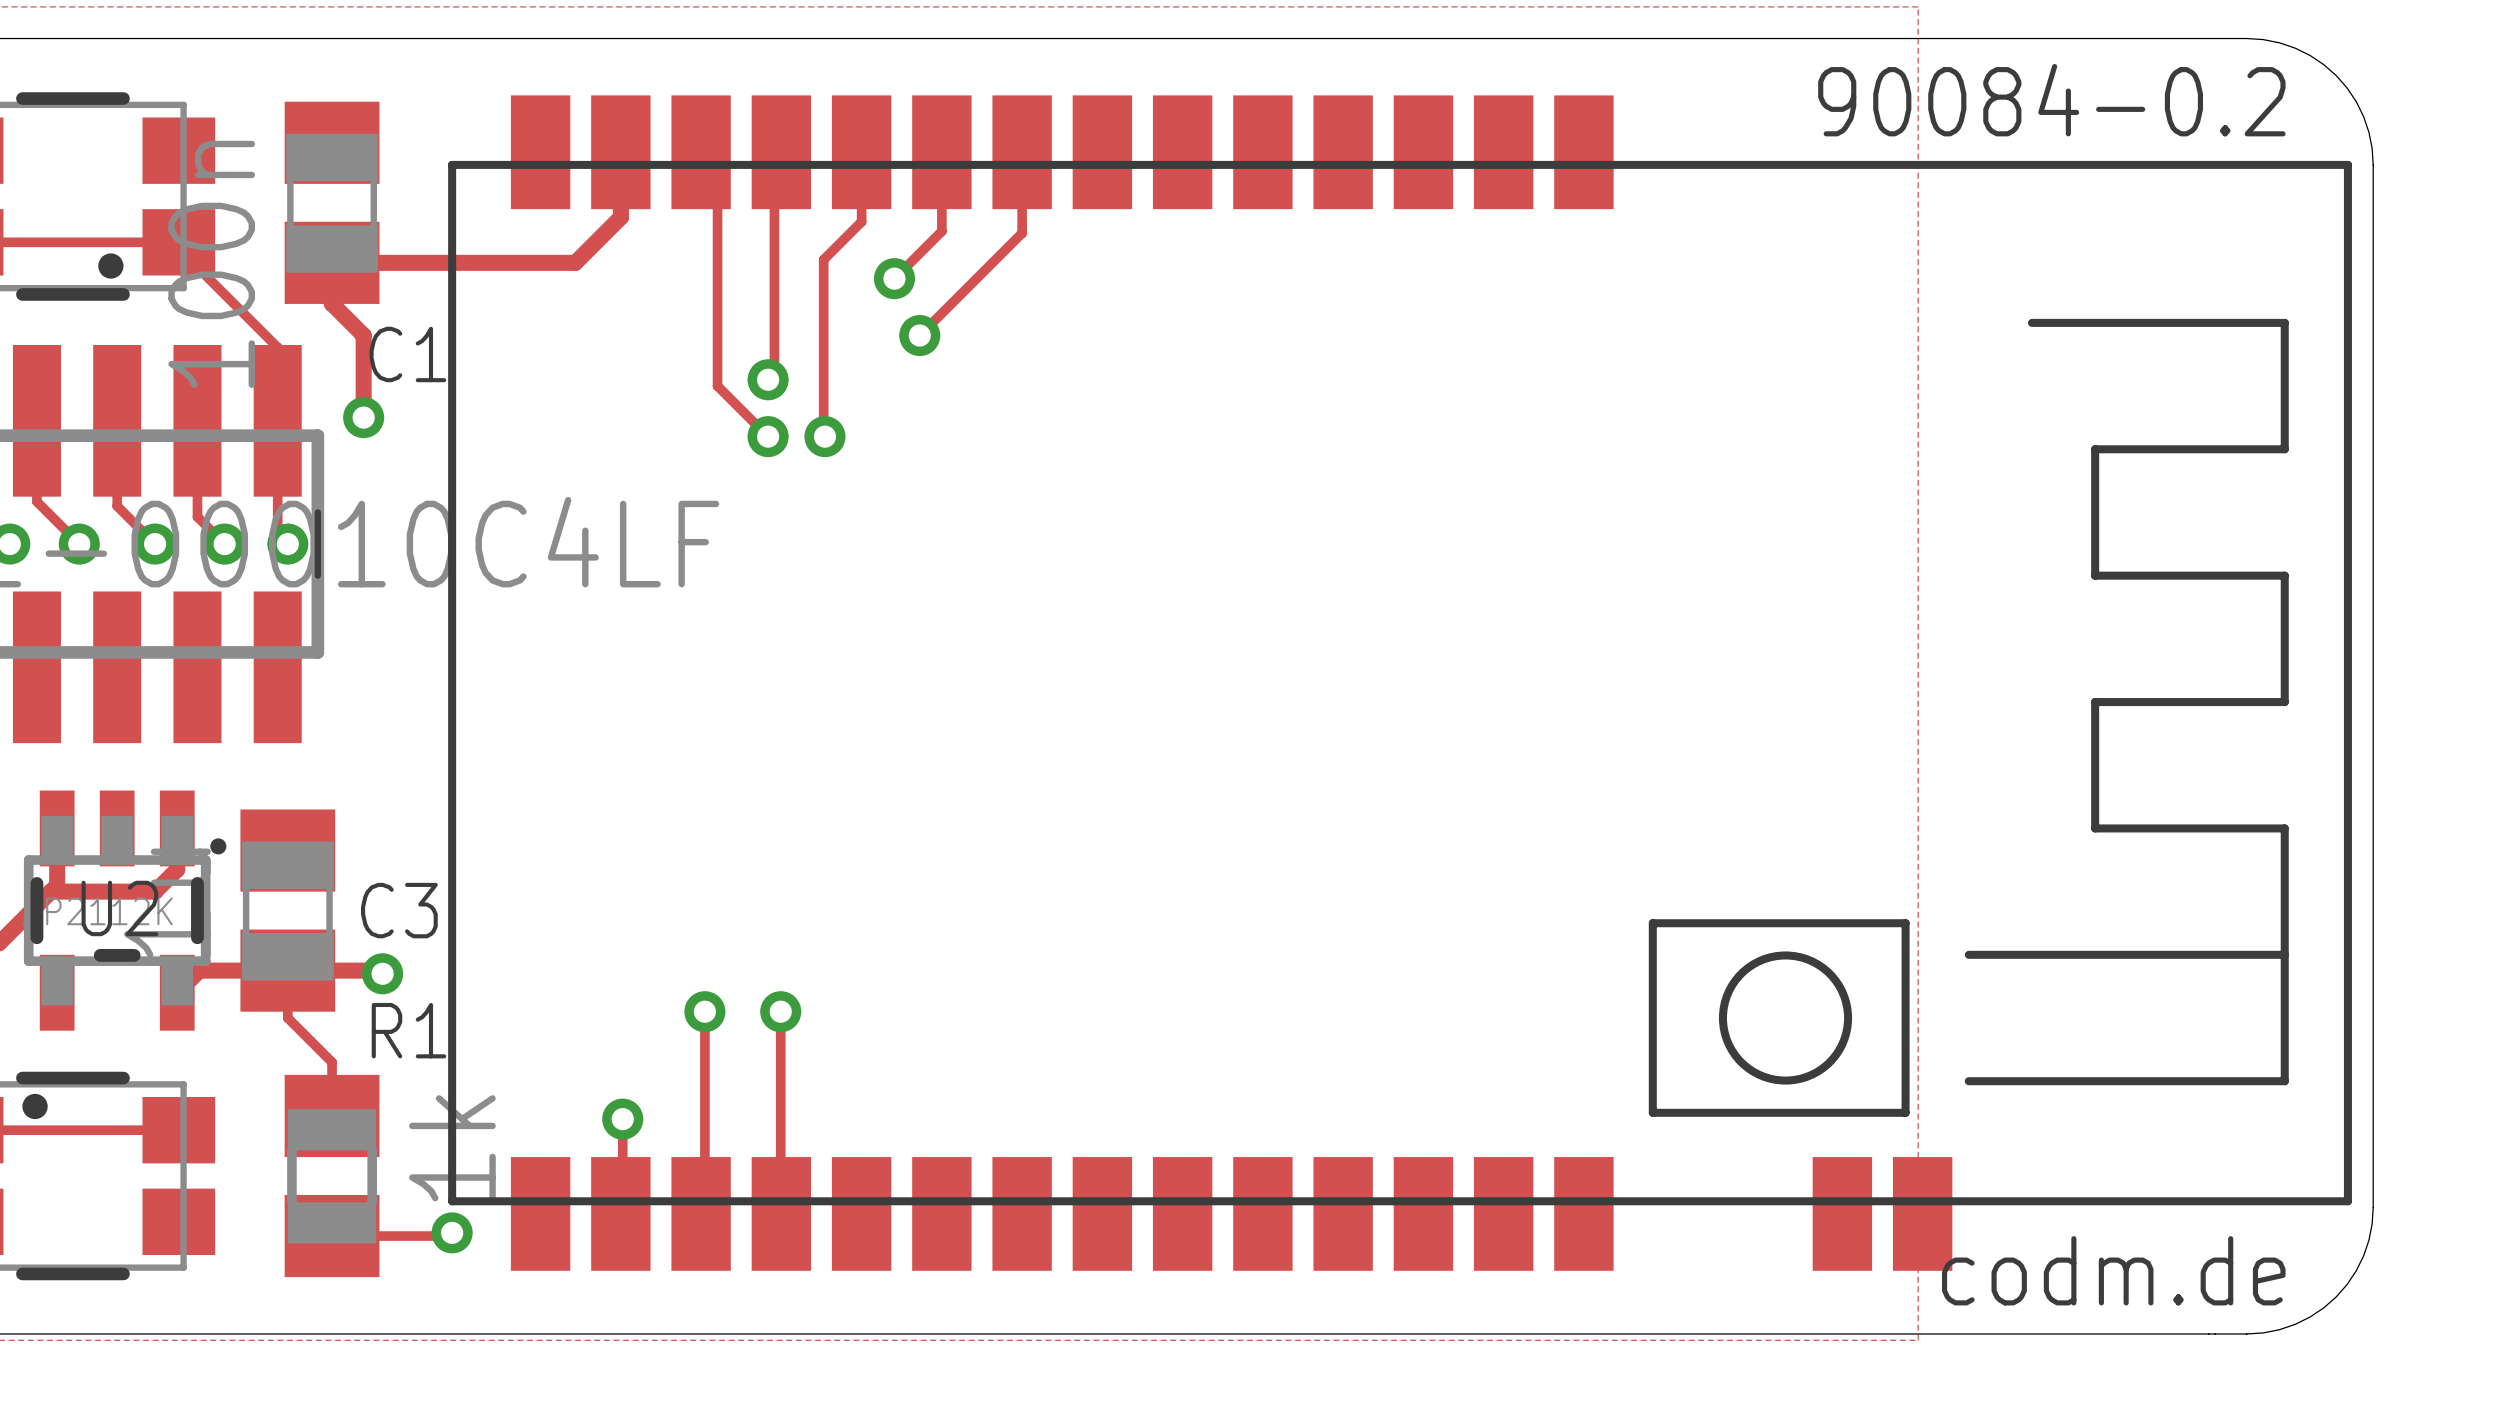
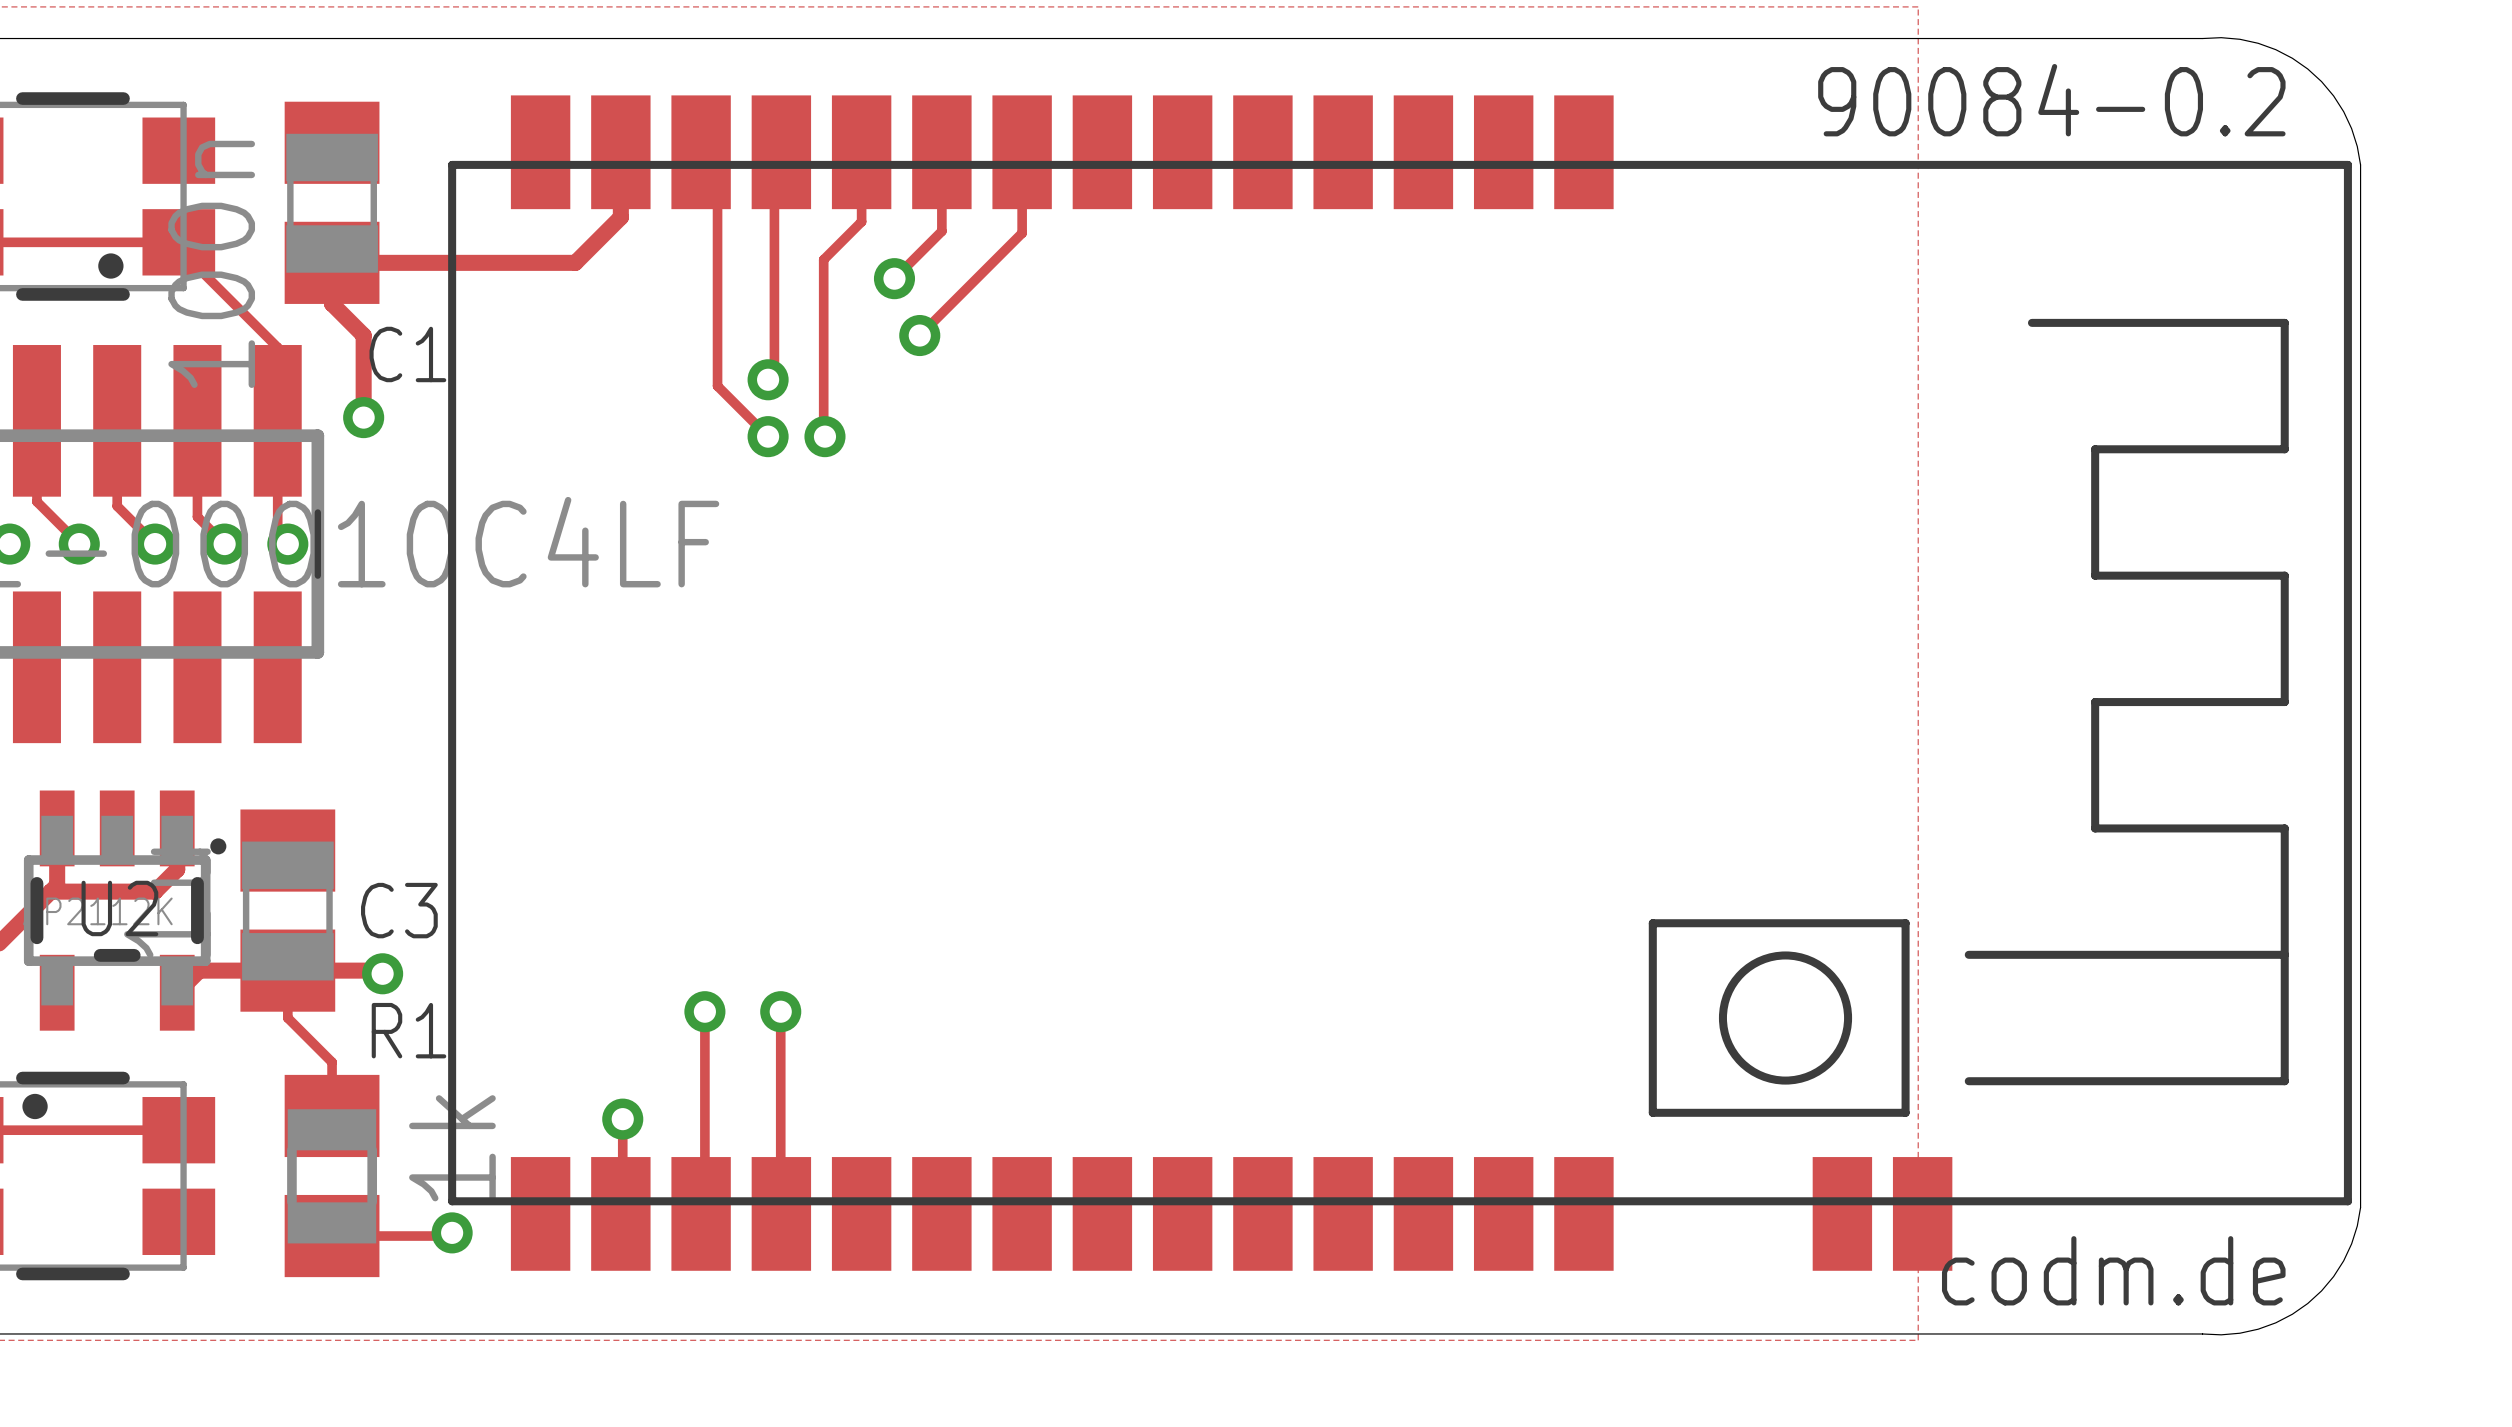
board edge: (2202, 38) (2246, 38) (2279, 42) (2310, 55) (2323, 64) (2347, 87) (2363, 116) (2368, 132) (2373, 164) (2372, 1224) (2363, 1255) (2356, 1270) (2336, 1296) (2310, 1317) (2295, 1324) (2263, 1332) (2202, 1333) -> (2202, 38) (2221, 37) (2258, 43) (2275, 49) (2307, 68) (2321, 81) (2343, 111) (2357, 146) (2360, 164) (2360, 1207) (2357, 1226) (2343, 1260) (2321, 1290) (2307, 1303) (2275, 1322) (2258, 1329) (2221, 1334) (2202, 1333)

